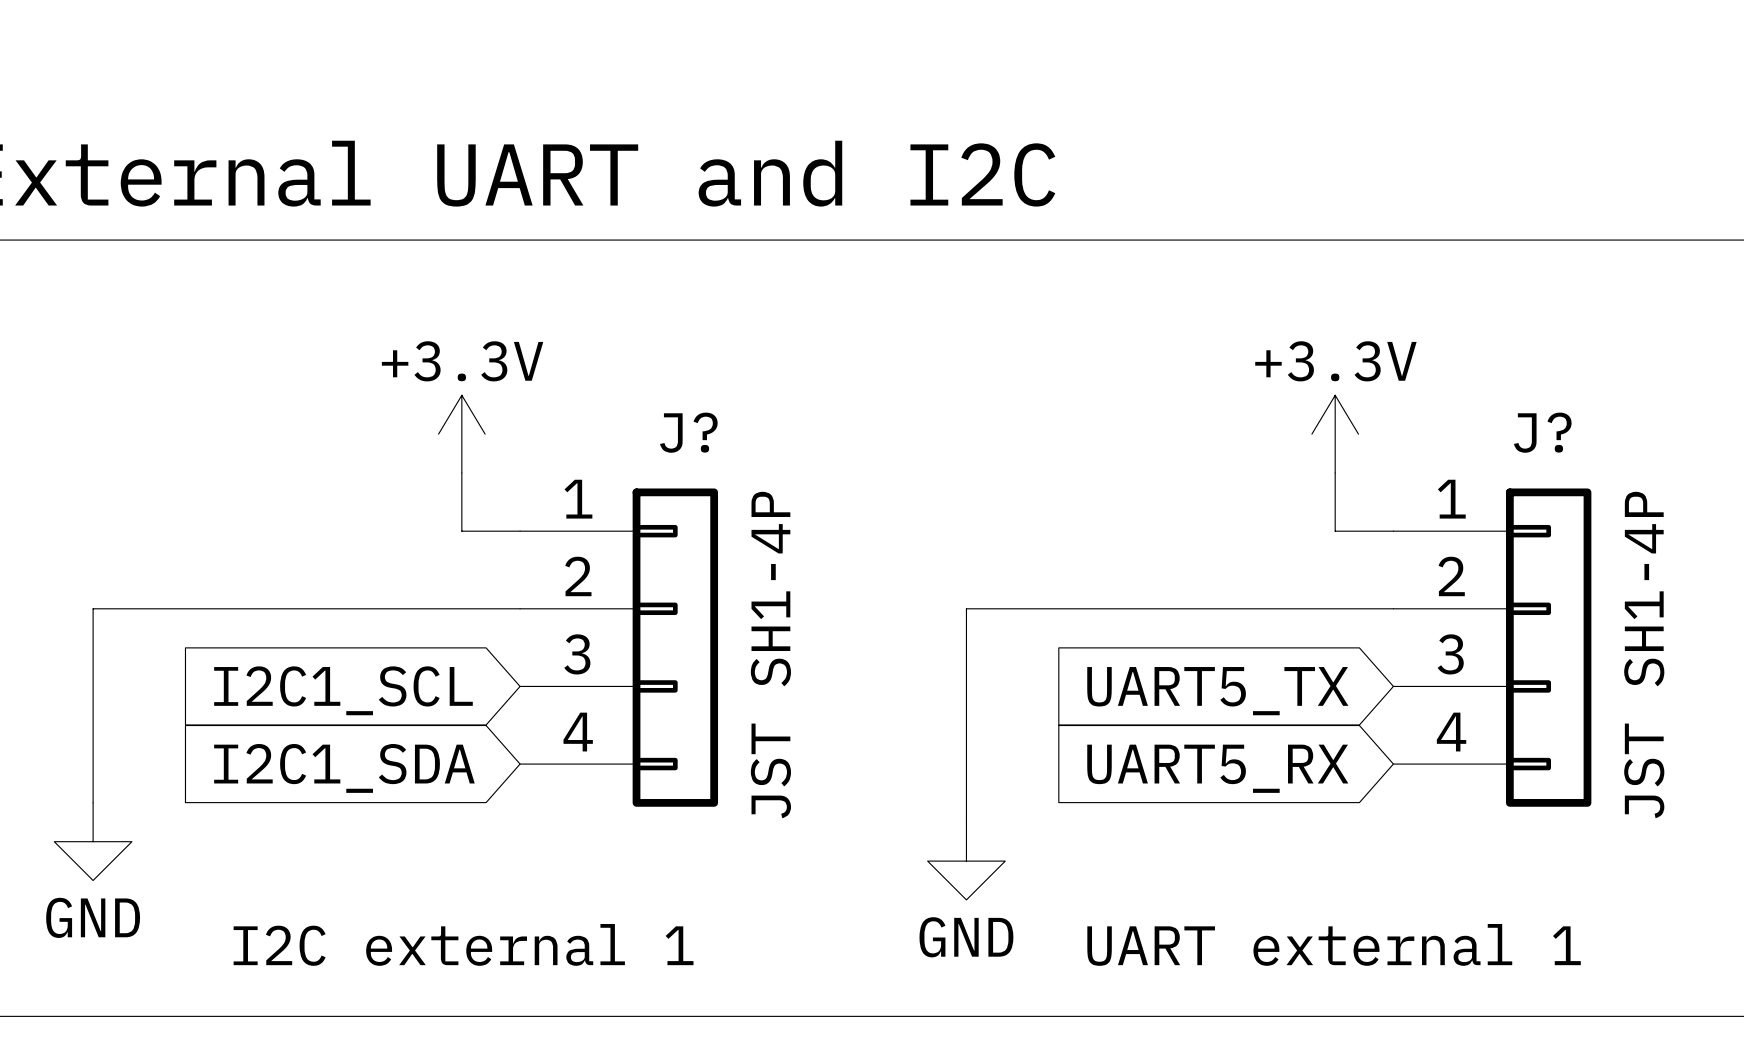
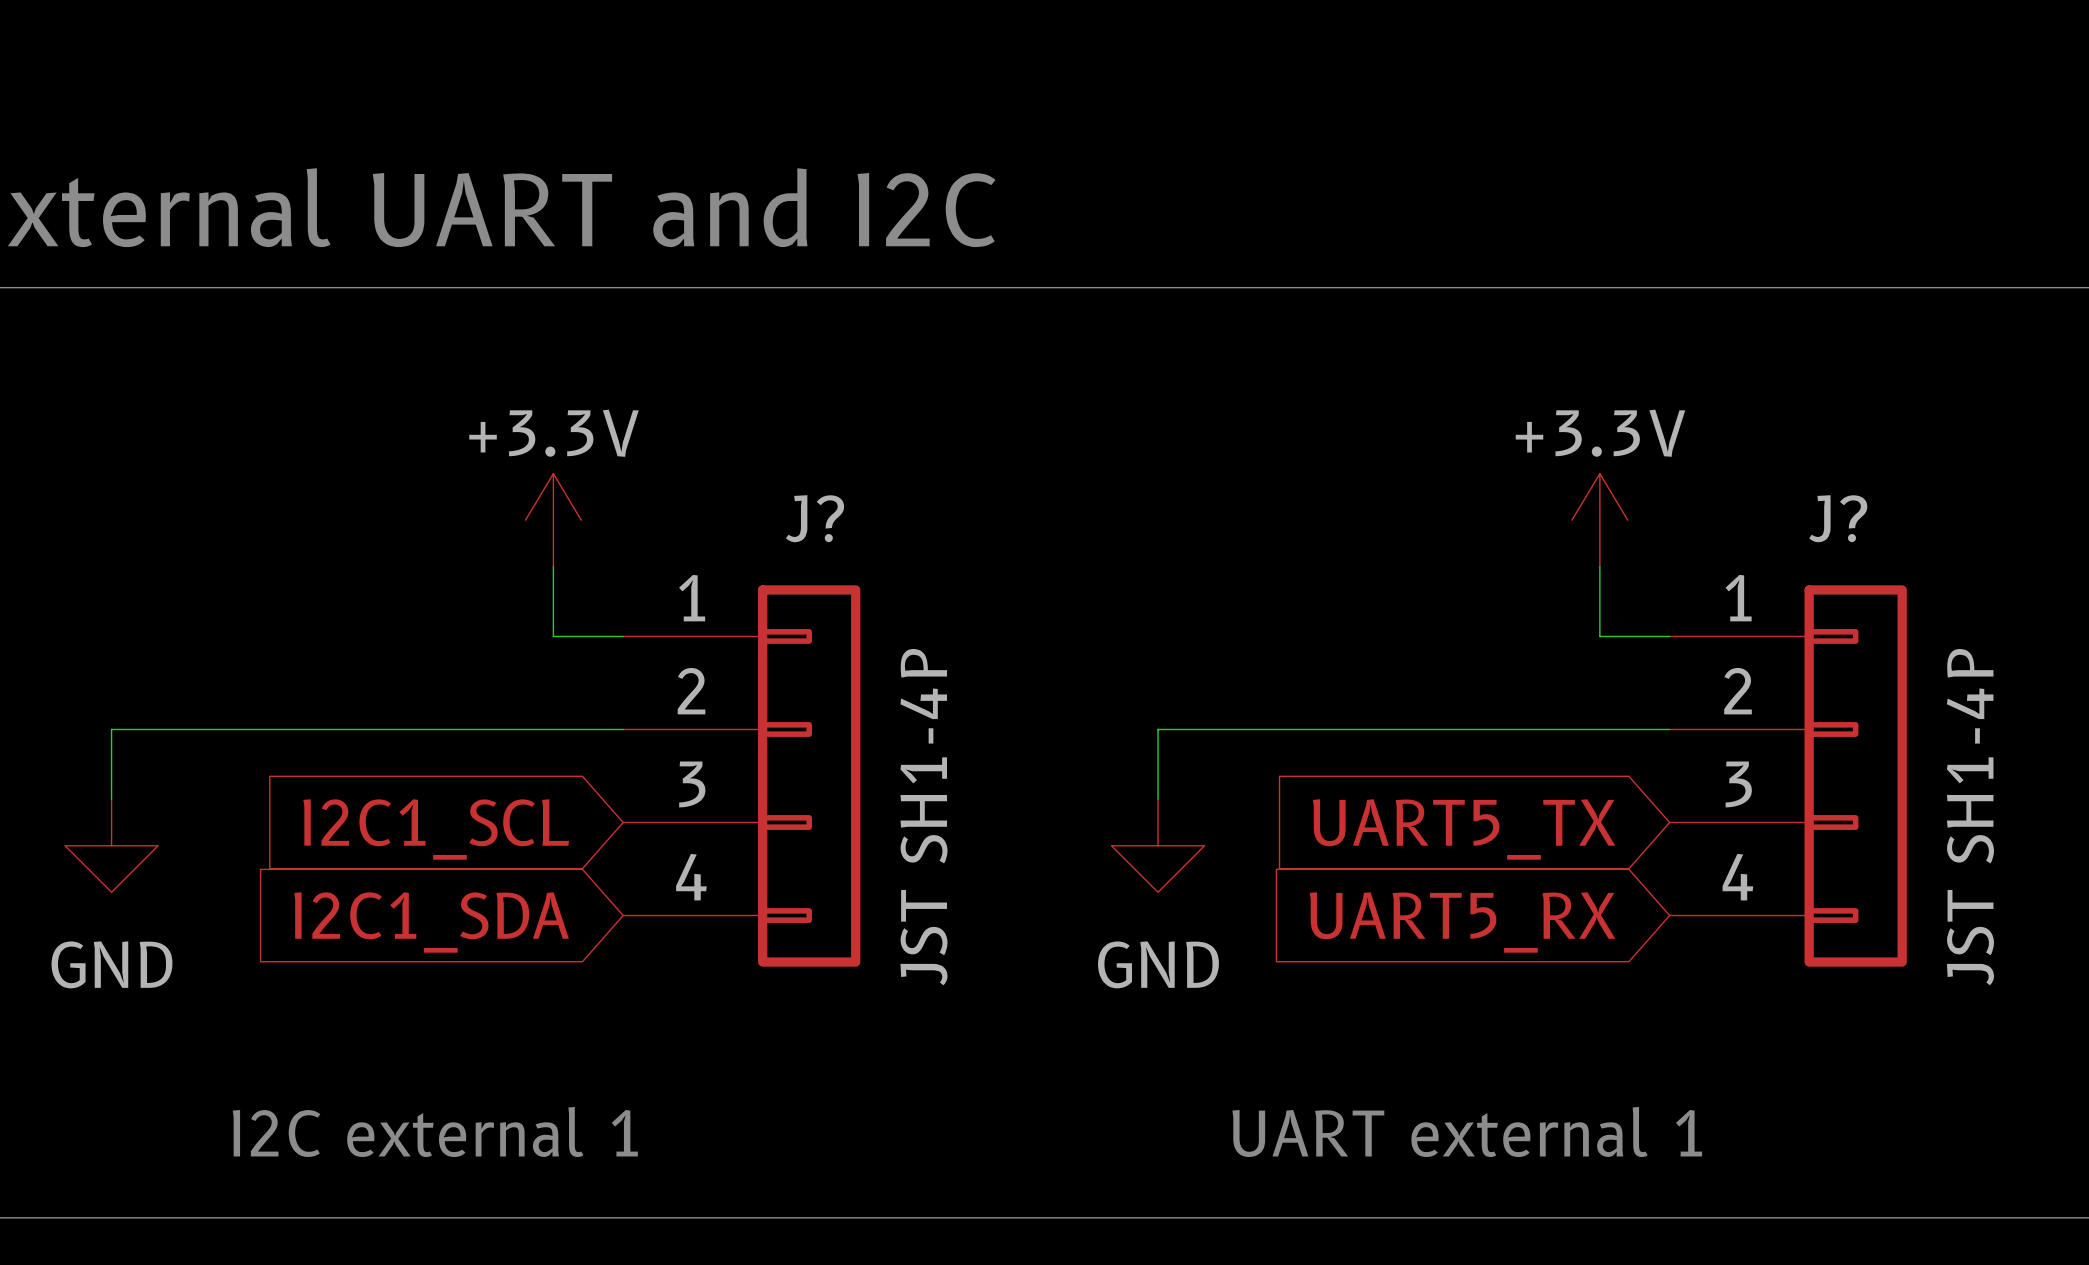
wire: (93, 667) (93, 802) -> none
wire: (966, 667) (966, 822) -> none
power symbol position: GND (93, 841) -> GND (111, 845)
power symbol position: GND (966, 861) -> GND (1158, 845)
power symbol text position: GND (93, 917) -> GND (111, 964)
power symbol text position: GND (966, 937) -> GND (1158, 964)
text position: I2C external 1 (463, 944) -> I2C external 1 (435, 1131)
text position: UART external 1 (1334, 944) -> UART external 1 (1467, 1131)

